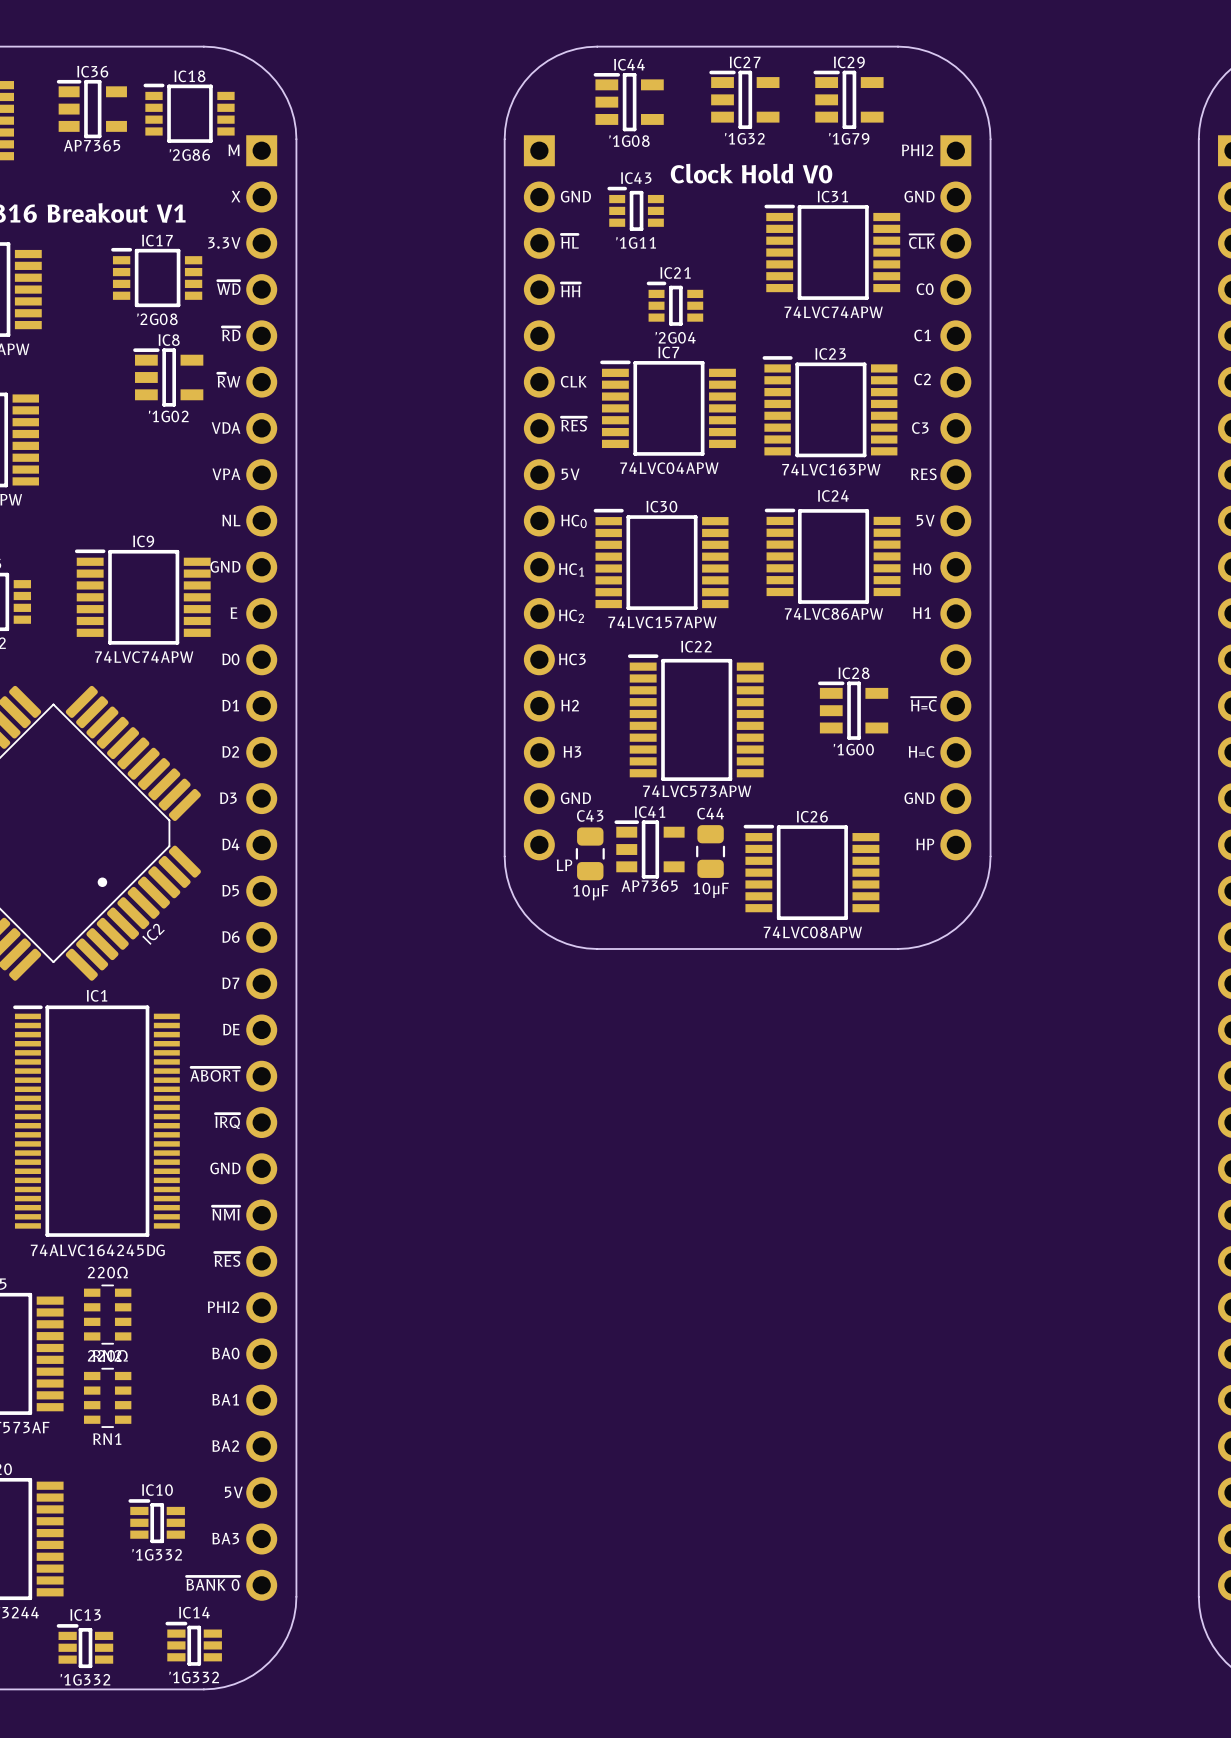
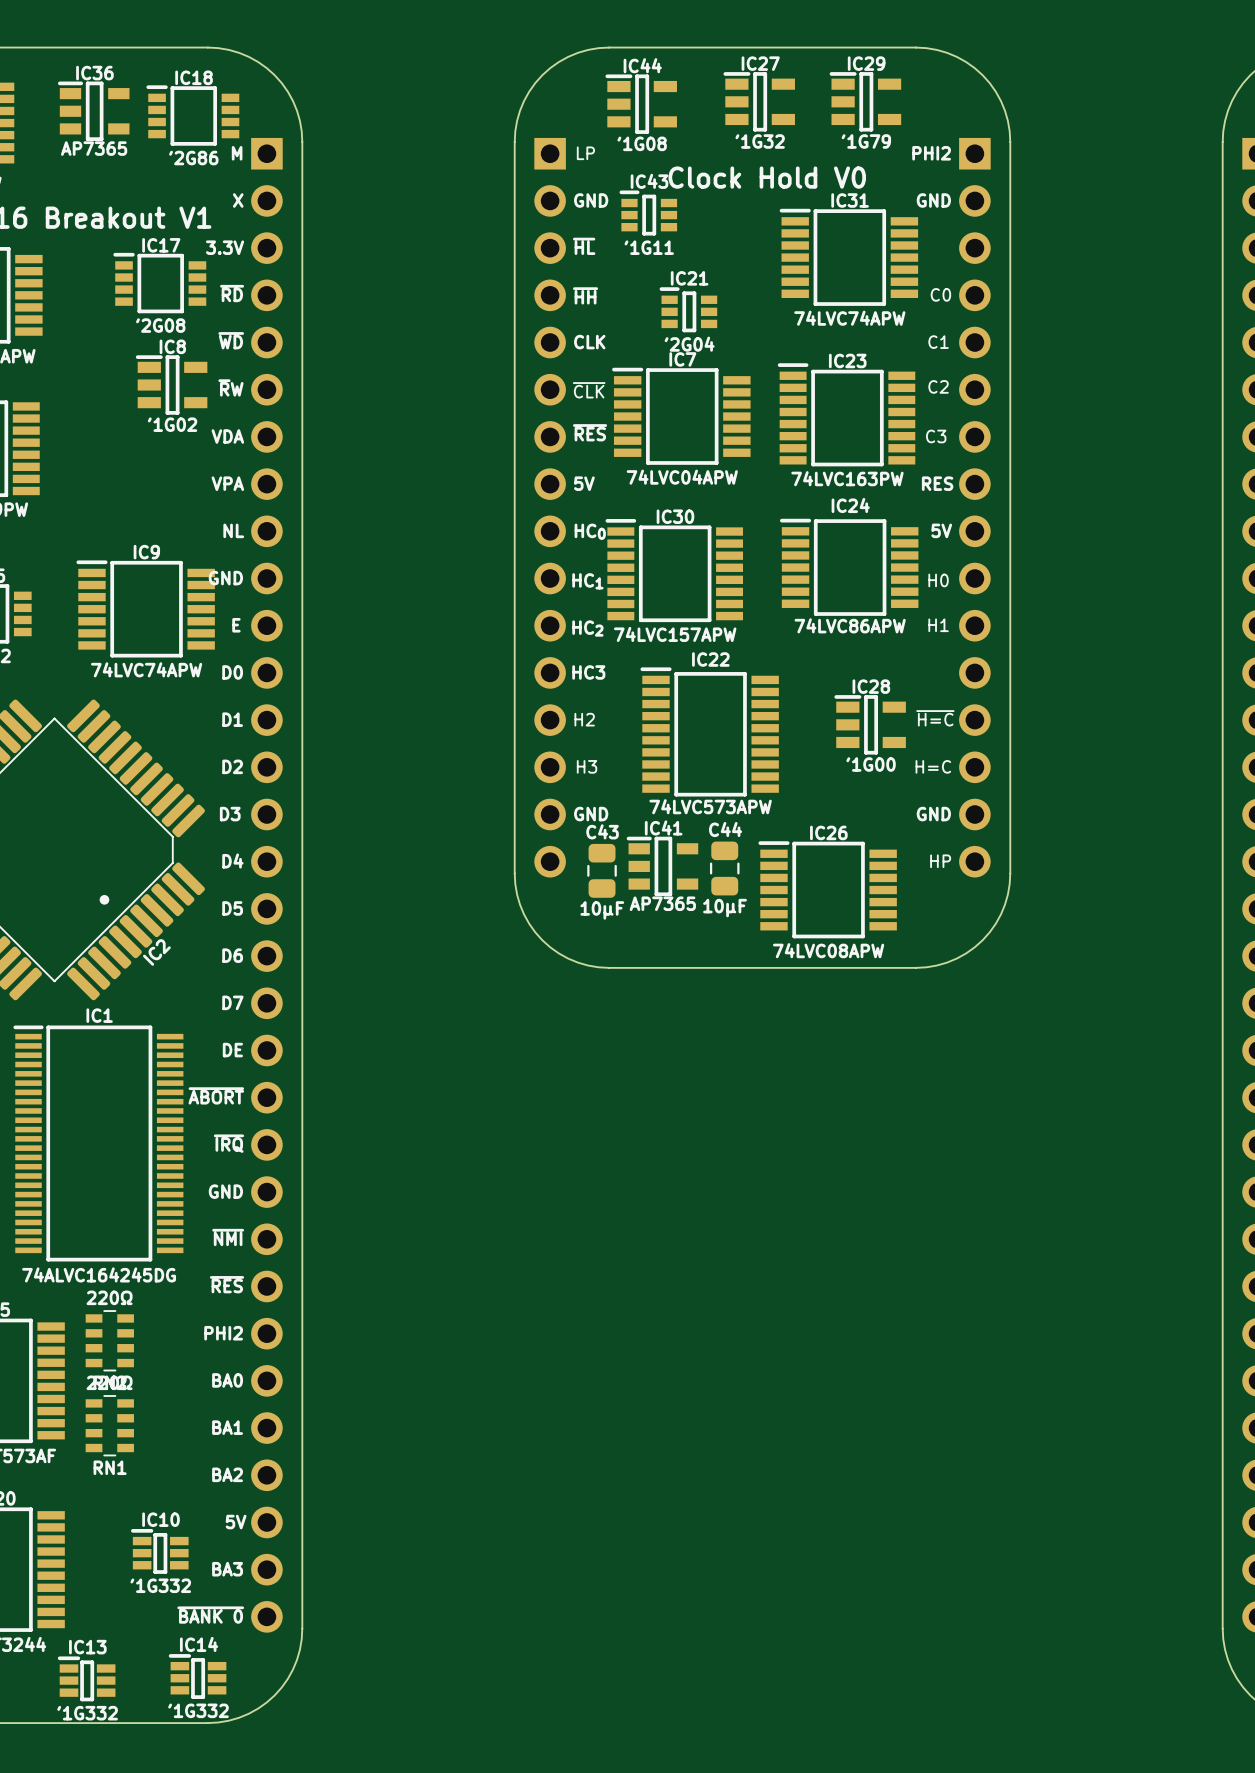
text: none -> LP (585, 153)
text position: ~{CLK} (922, 241) -> ~{CLK} (589, 390)
text: ~{WD} (228, 287) -> ~{RD} (232, 293)
text: ~{RD} (231, 334) -> ~{WD} (231, 340)
text position: CLK (573, 381) -> CLK (589, 342)
text: LP (564, 865) -> none

